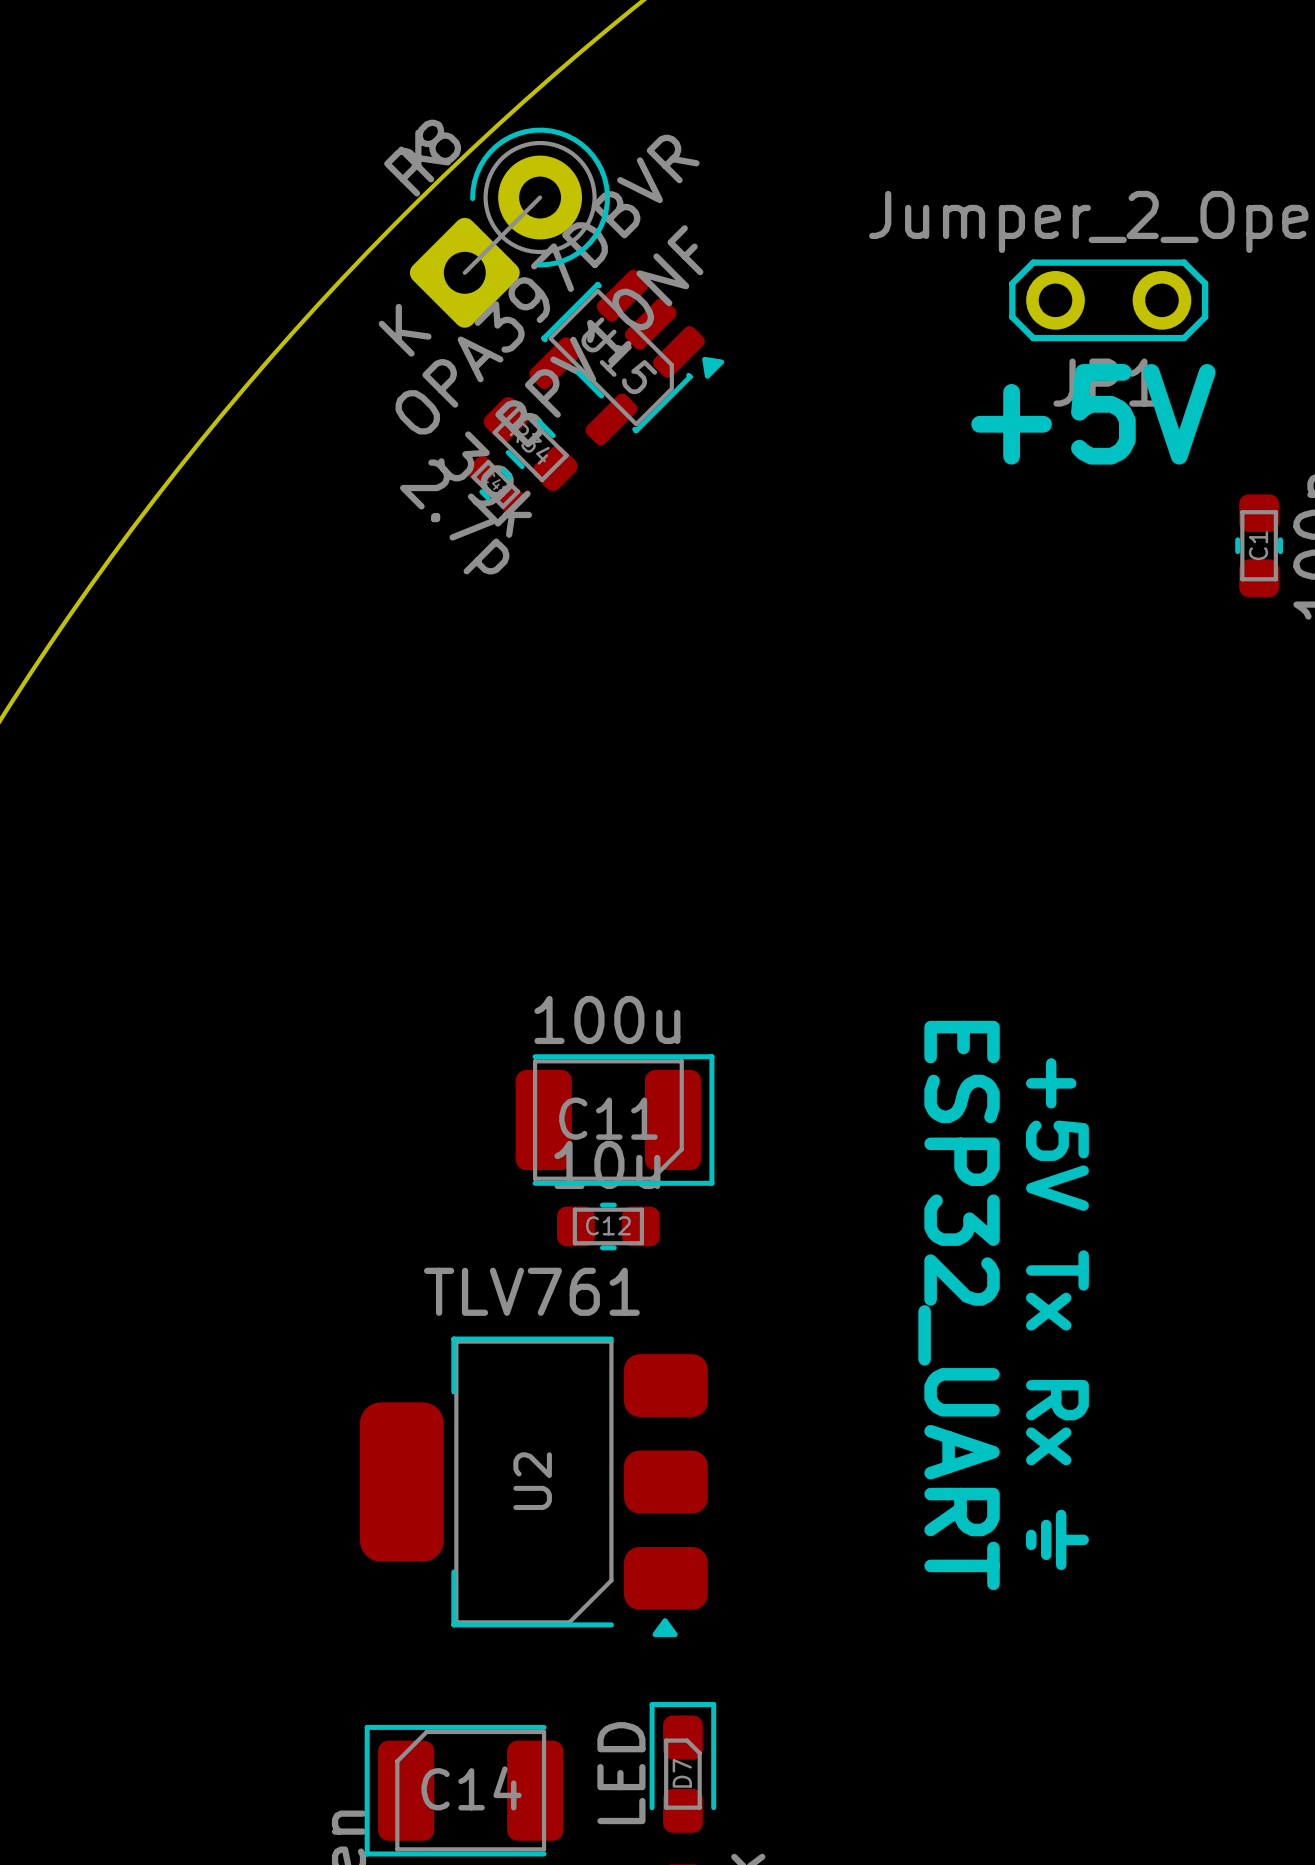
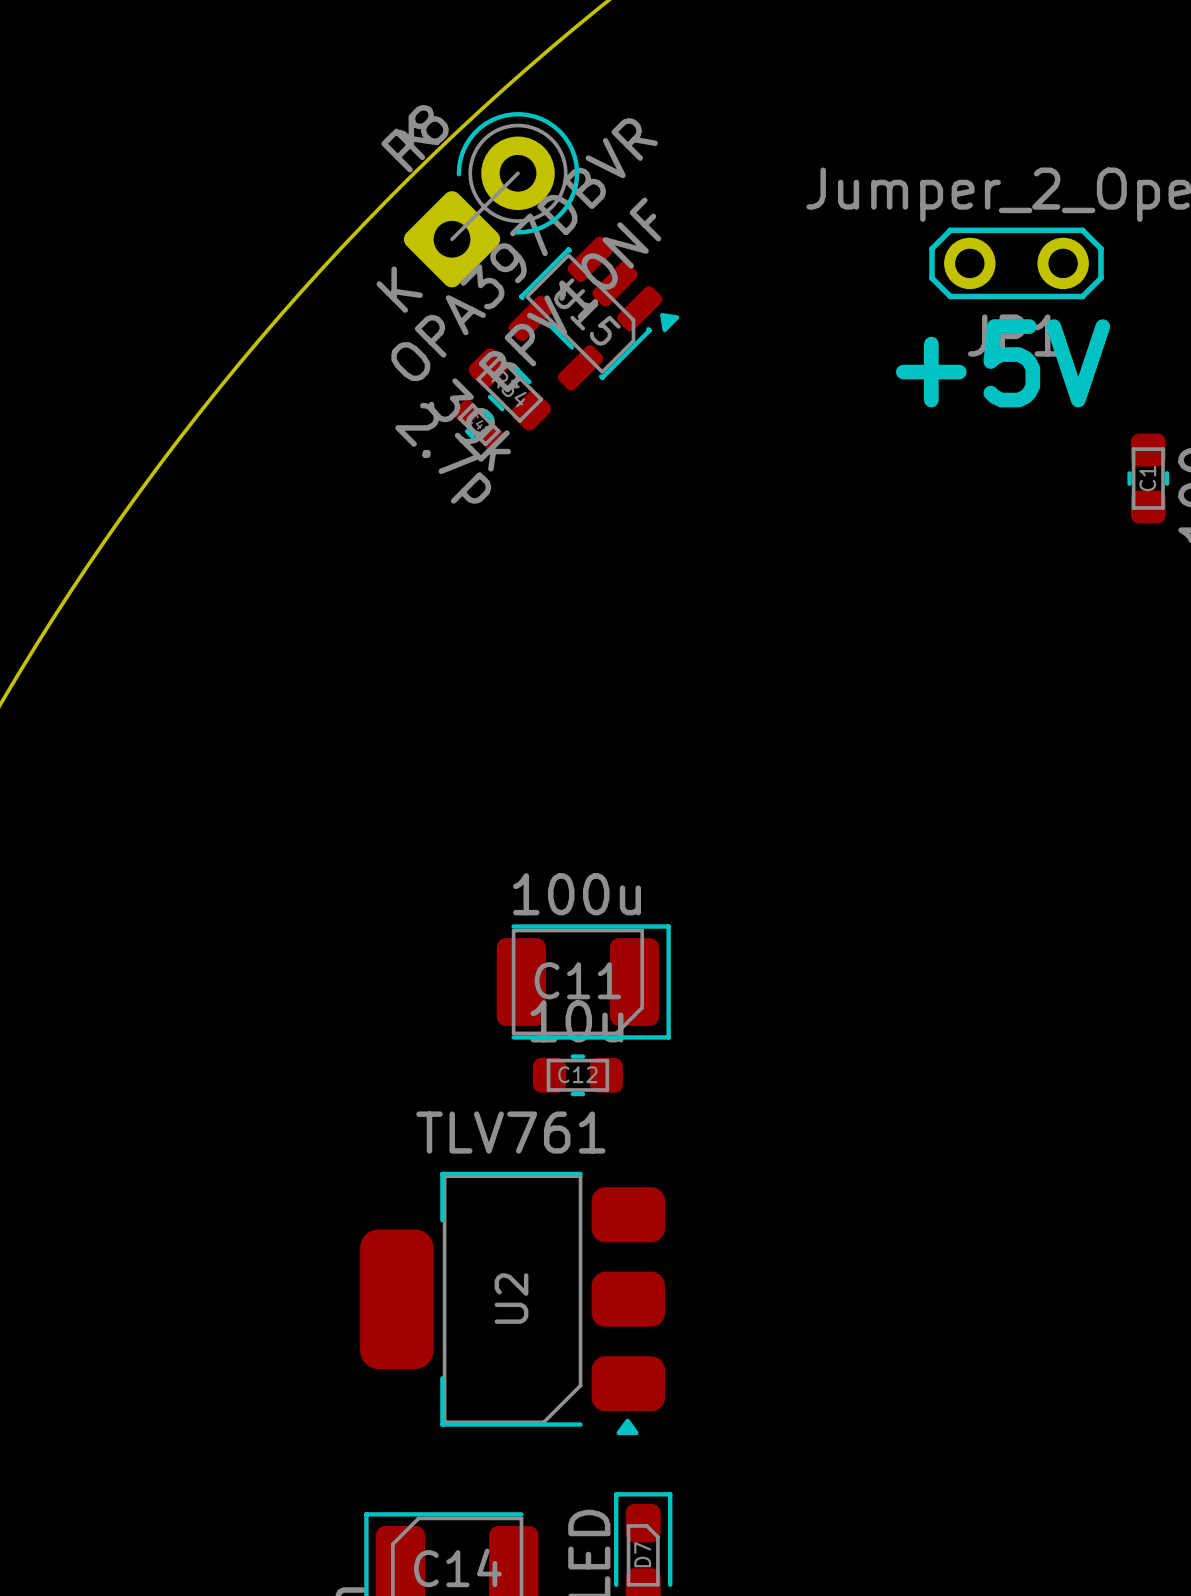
text: ESP32_UART (959, 1305) -> none
text: +5V Tx Rx ⏚ (1057, 1314) -> none

